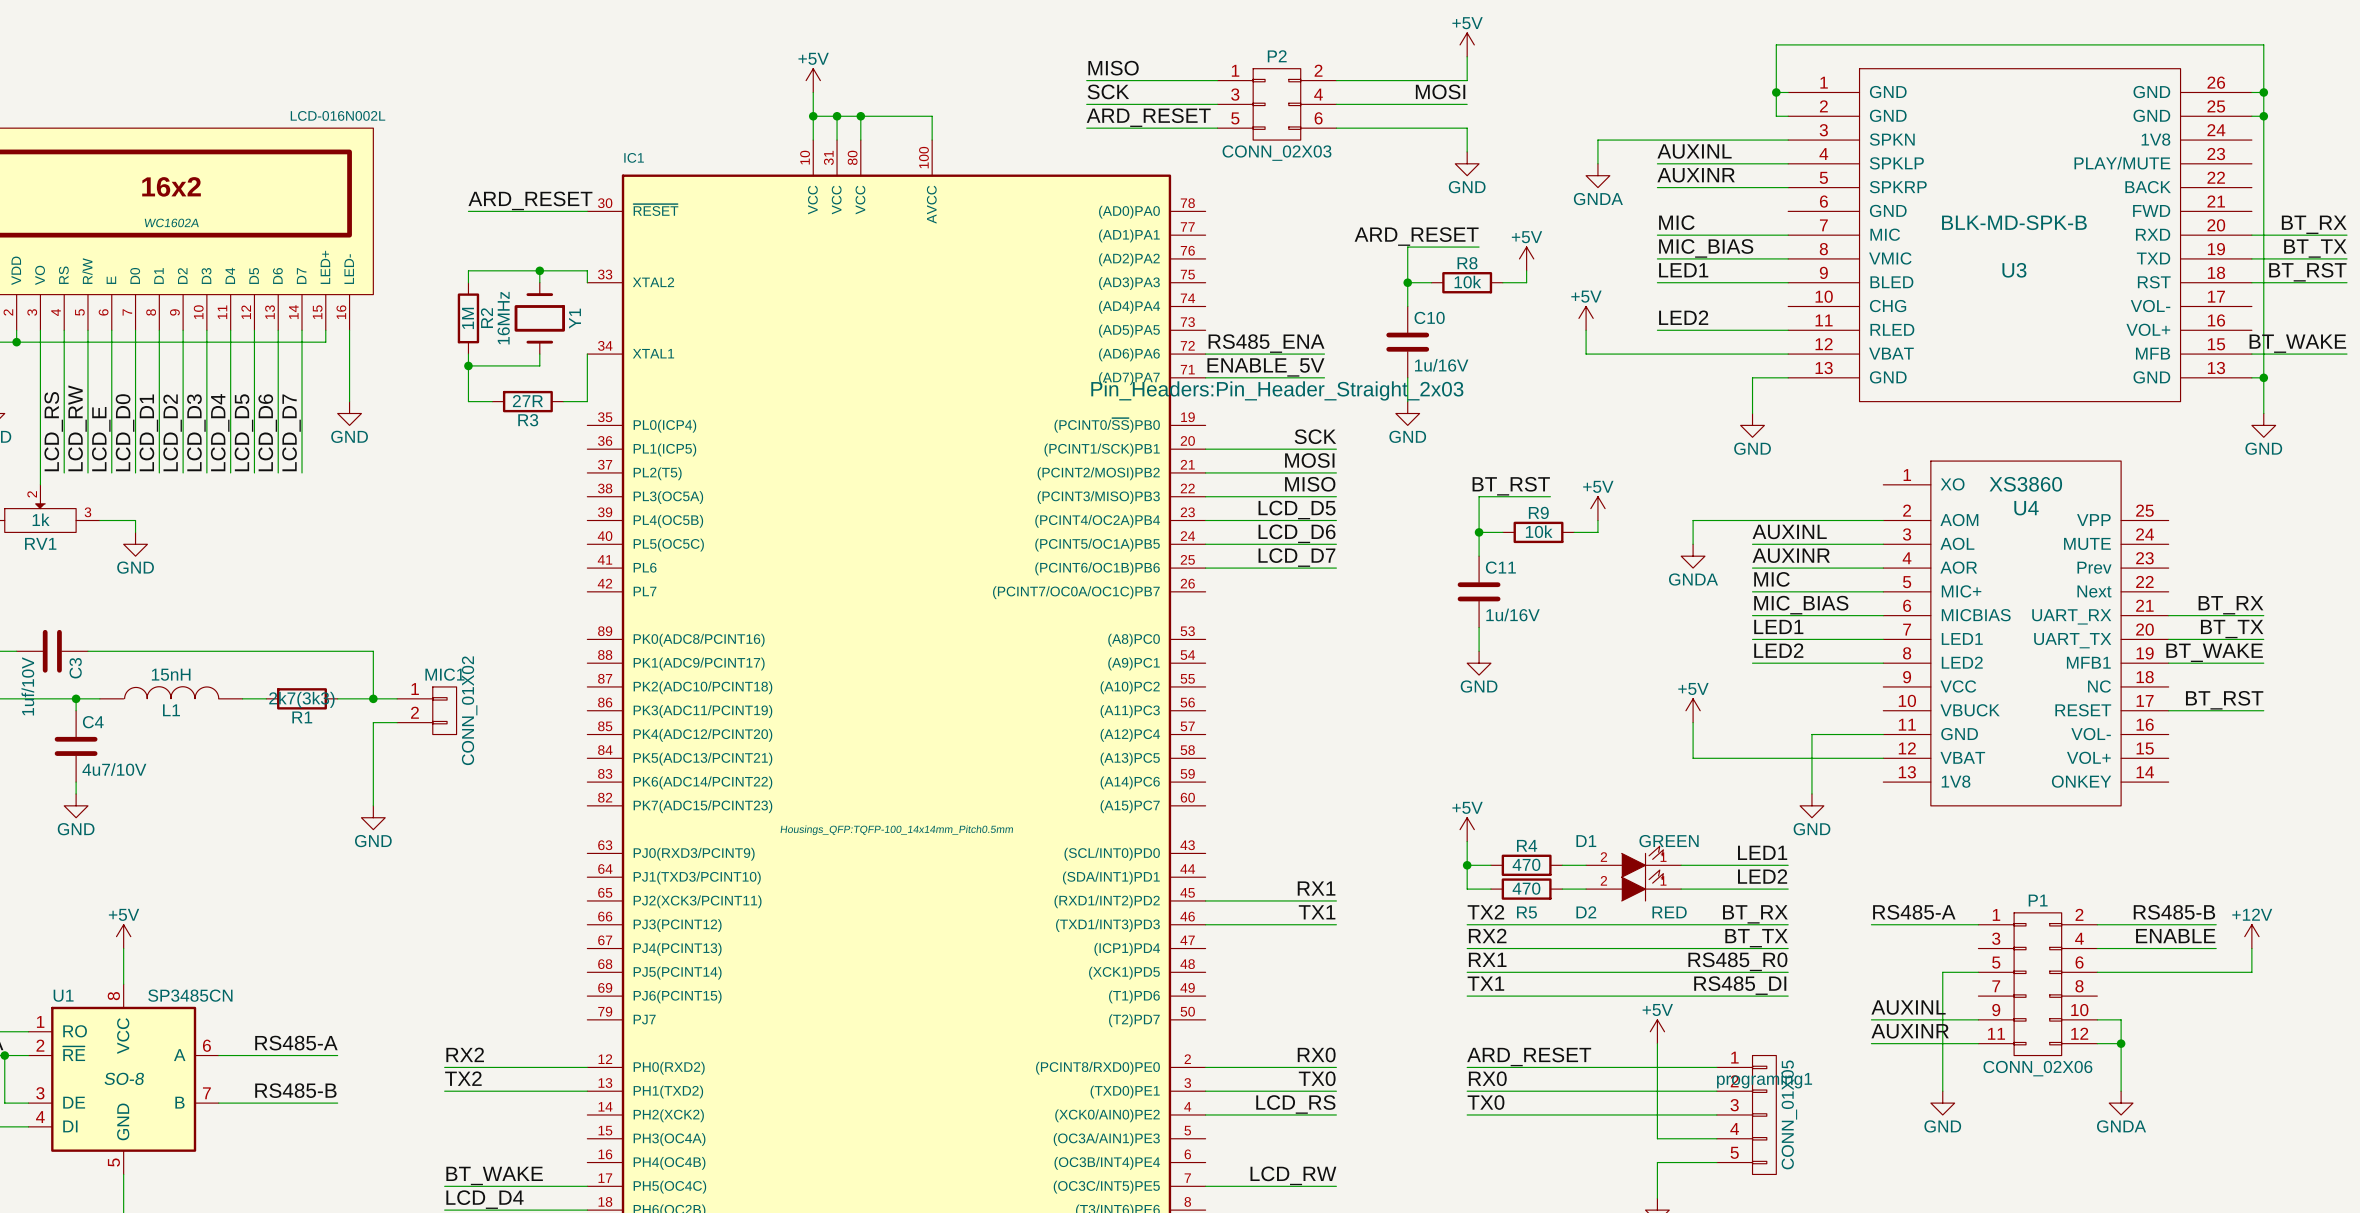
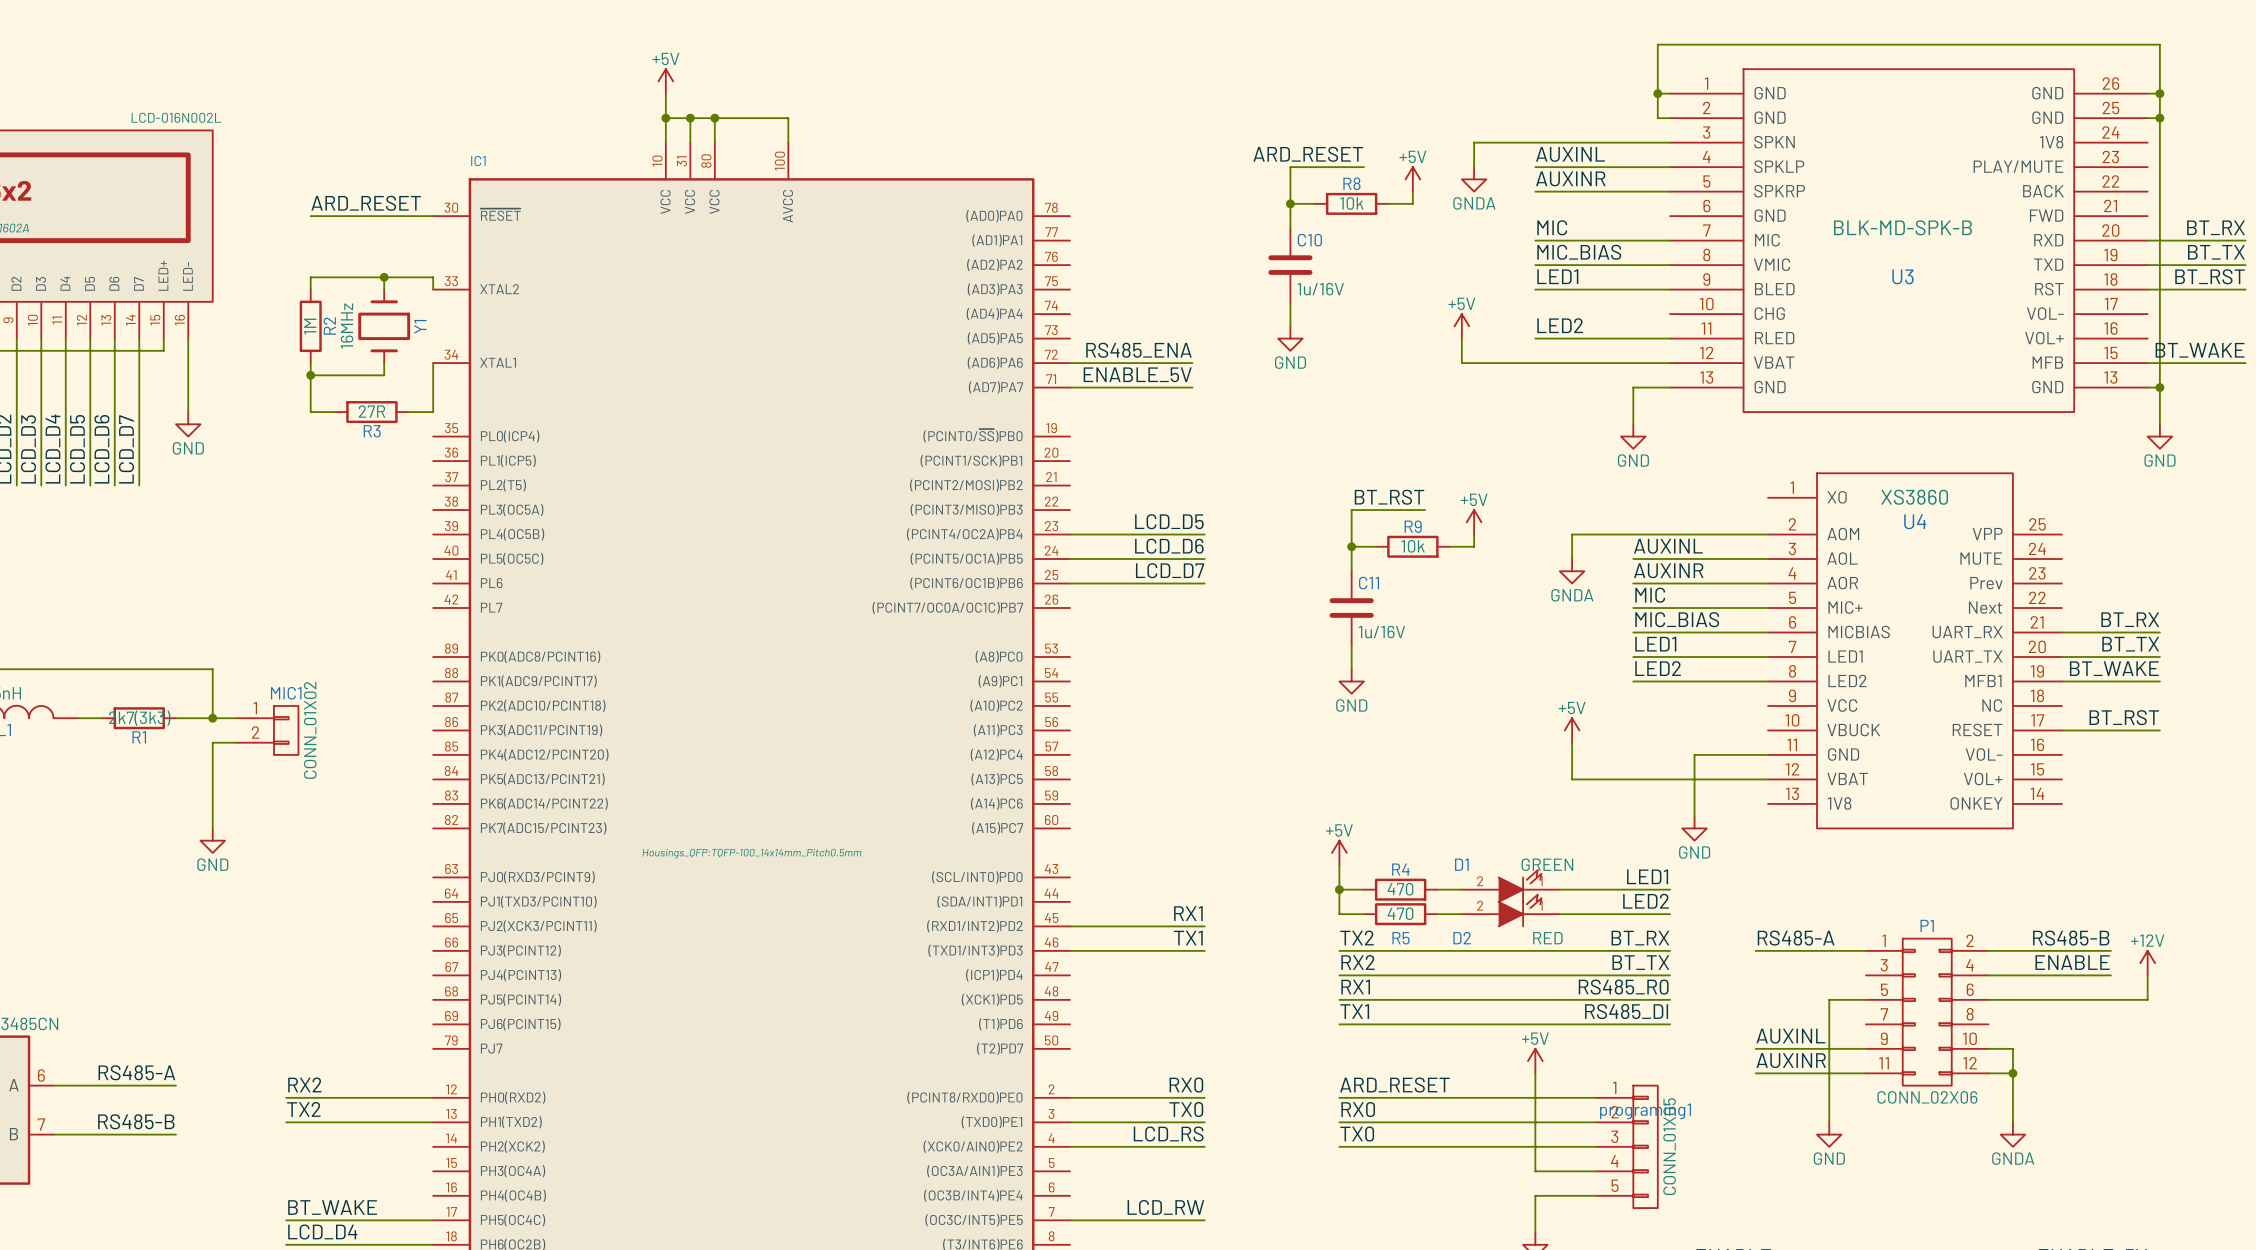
power symbol: +5V (1467, 44) -> none
wire: (1467, 56) (1467, 80) (1336, 80) -> none
label: MISO (1113, 68) -> none
wire: (1086, 80) (1217, 80) -> none
label: SCK (1108, 91) -> none
label: MOSI (1440, 91) -> none
wire: (1086, 104) (1217, 104) -> none
P2: CONN_02X03 (1276, 104) -> none
wire: (1336, 104) (1467, 104) -> none
label: ARD_RESET (1148, 117) -> none
wire: (1086, 128) (1217, 128) -> none
wire: (1336, 128) (1467, 128) (1467, 151) -> none
power symbol: GND (1467, 163) -> none
power symbol: none -> +5V (1412, 179)
junction: none -> (1290, 203)
label position: ARD_RESET (1416, 236) -> ARD_RESET (1308, 154)
wire: (1479, 247) (1407, 247) (1407, 306) -> (1363, 167) (1290, 167) (1290, 228)
power symbol: +5V (1526, 258) -> none
wire: (1526, 270) (1526, 282) (1502, 282) -> (1412, 191) (1412, 203) (1388, 203)
wire: (1407, 282) (1431, 282) -> (1290, 203) (1314, 203)
junction: (1407, 282) -> none
R8 position: (1467, 282) -> (1351, 203)
C10 position: (1407, 342) -> (1290, 265)
wire: (1407, 377) (1407, 401) -> (1290, 301) (1290, 326)
power symbol position: GND (1407, 413) -> GND (1290, 338)
label: SCK (1315, 436) -> none
wire: (1205, 449) (1336, 449) -> none
label: MOSI (1309, 460) -> none
wire: (1205, 472) (1336, 472) -> none
label: MISO (1310, 484) -> none
wire: (1205, 496) (1336, 496) -> none

